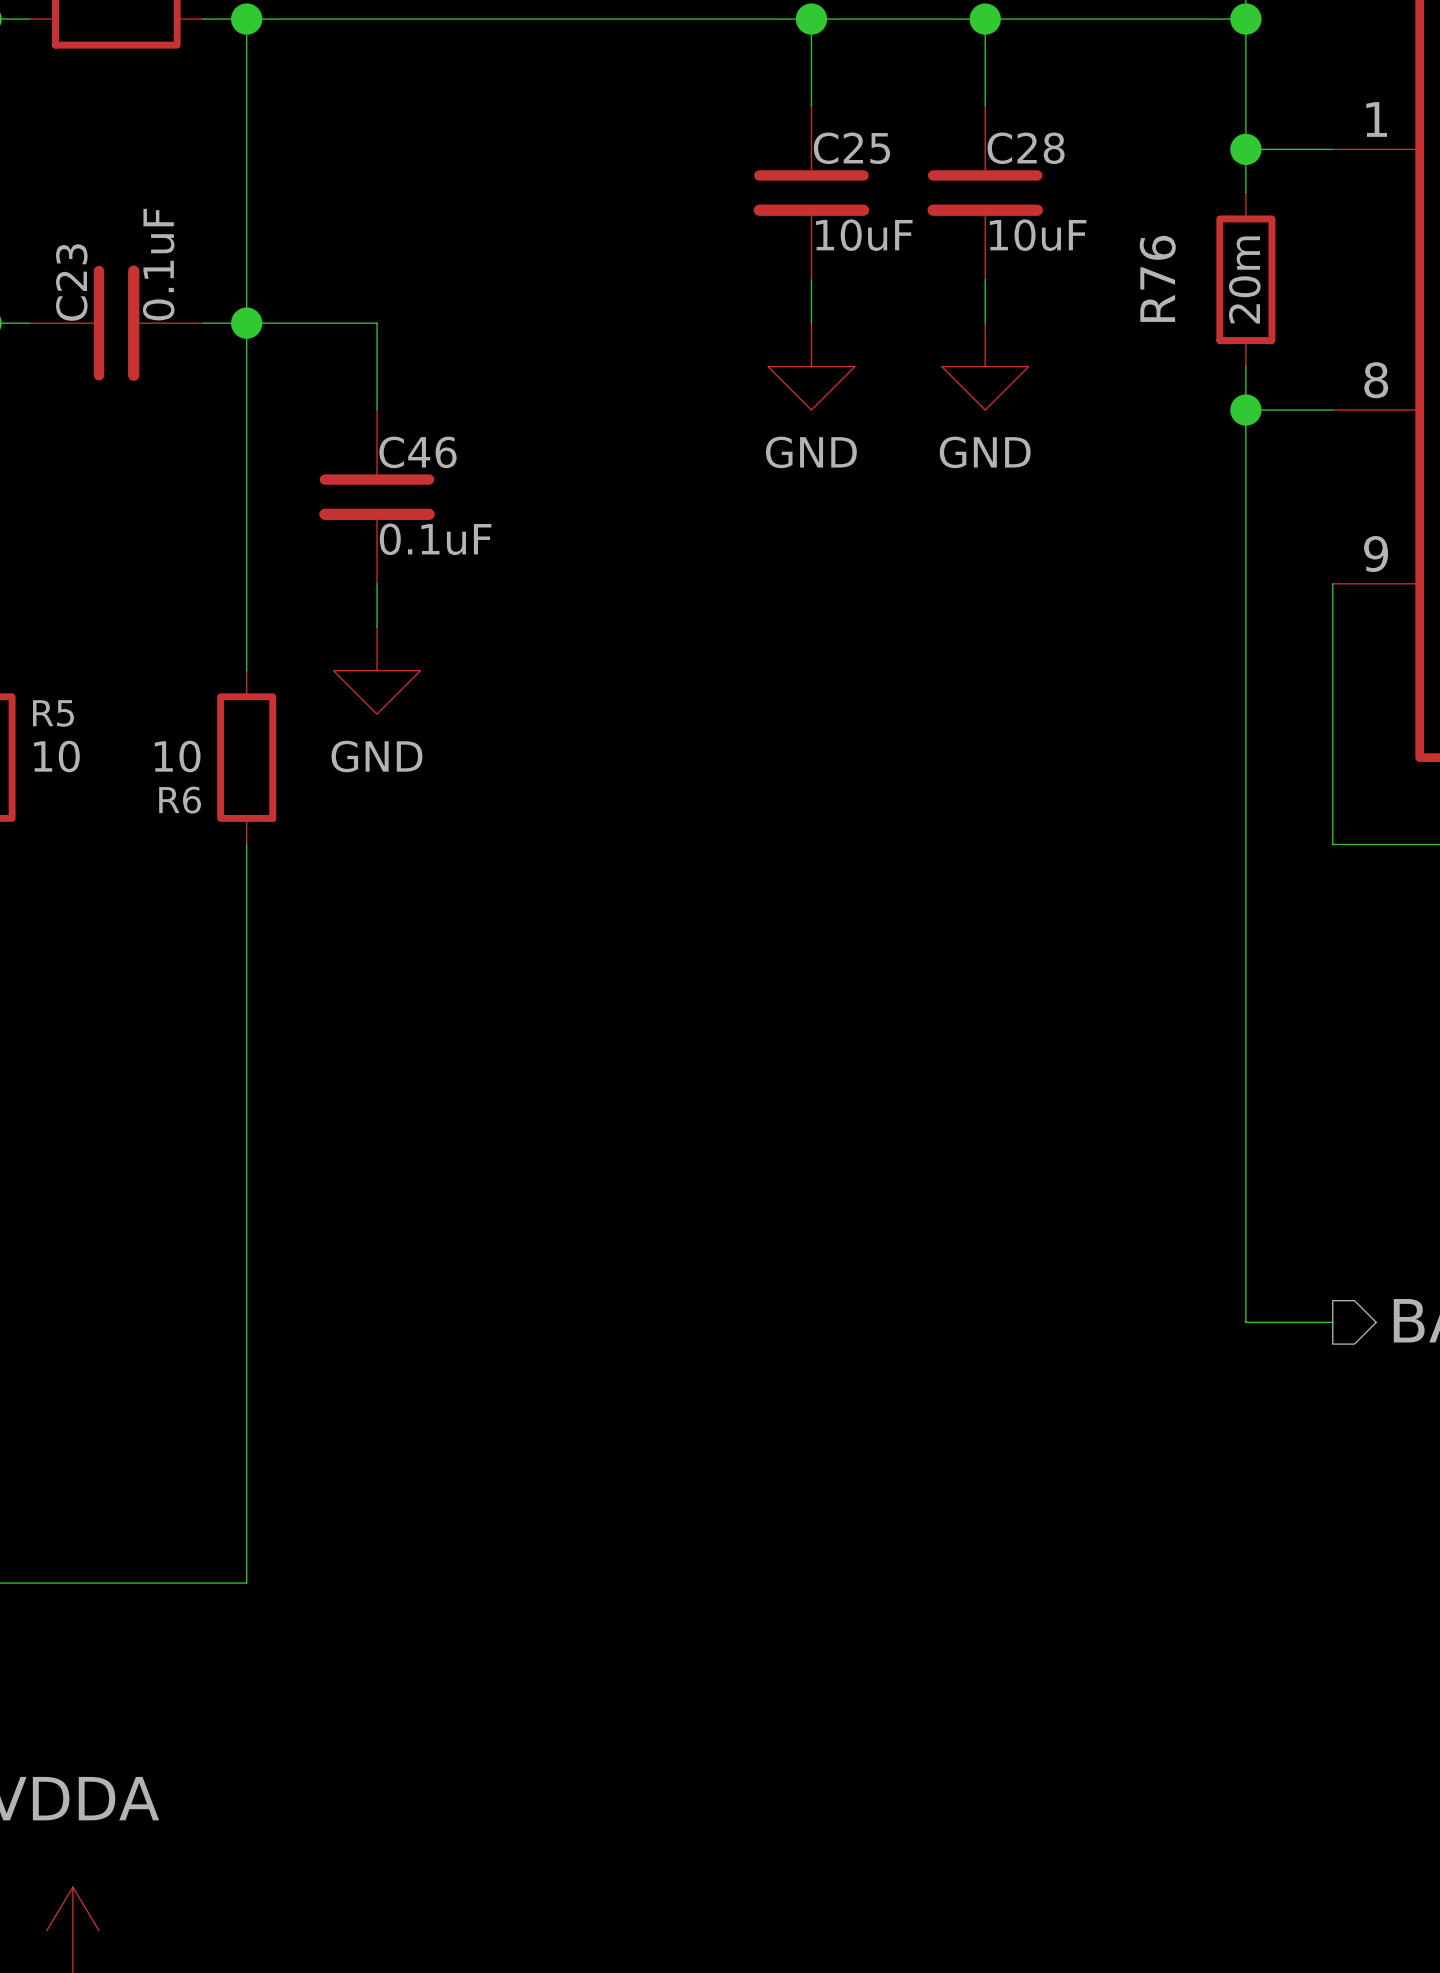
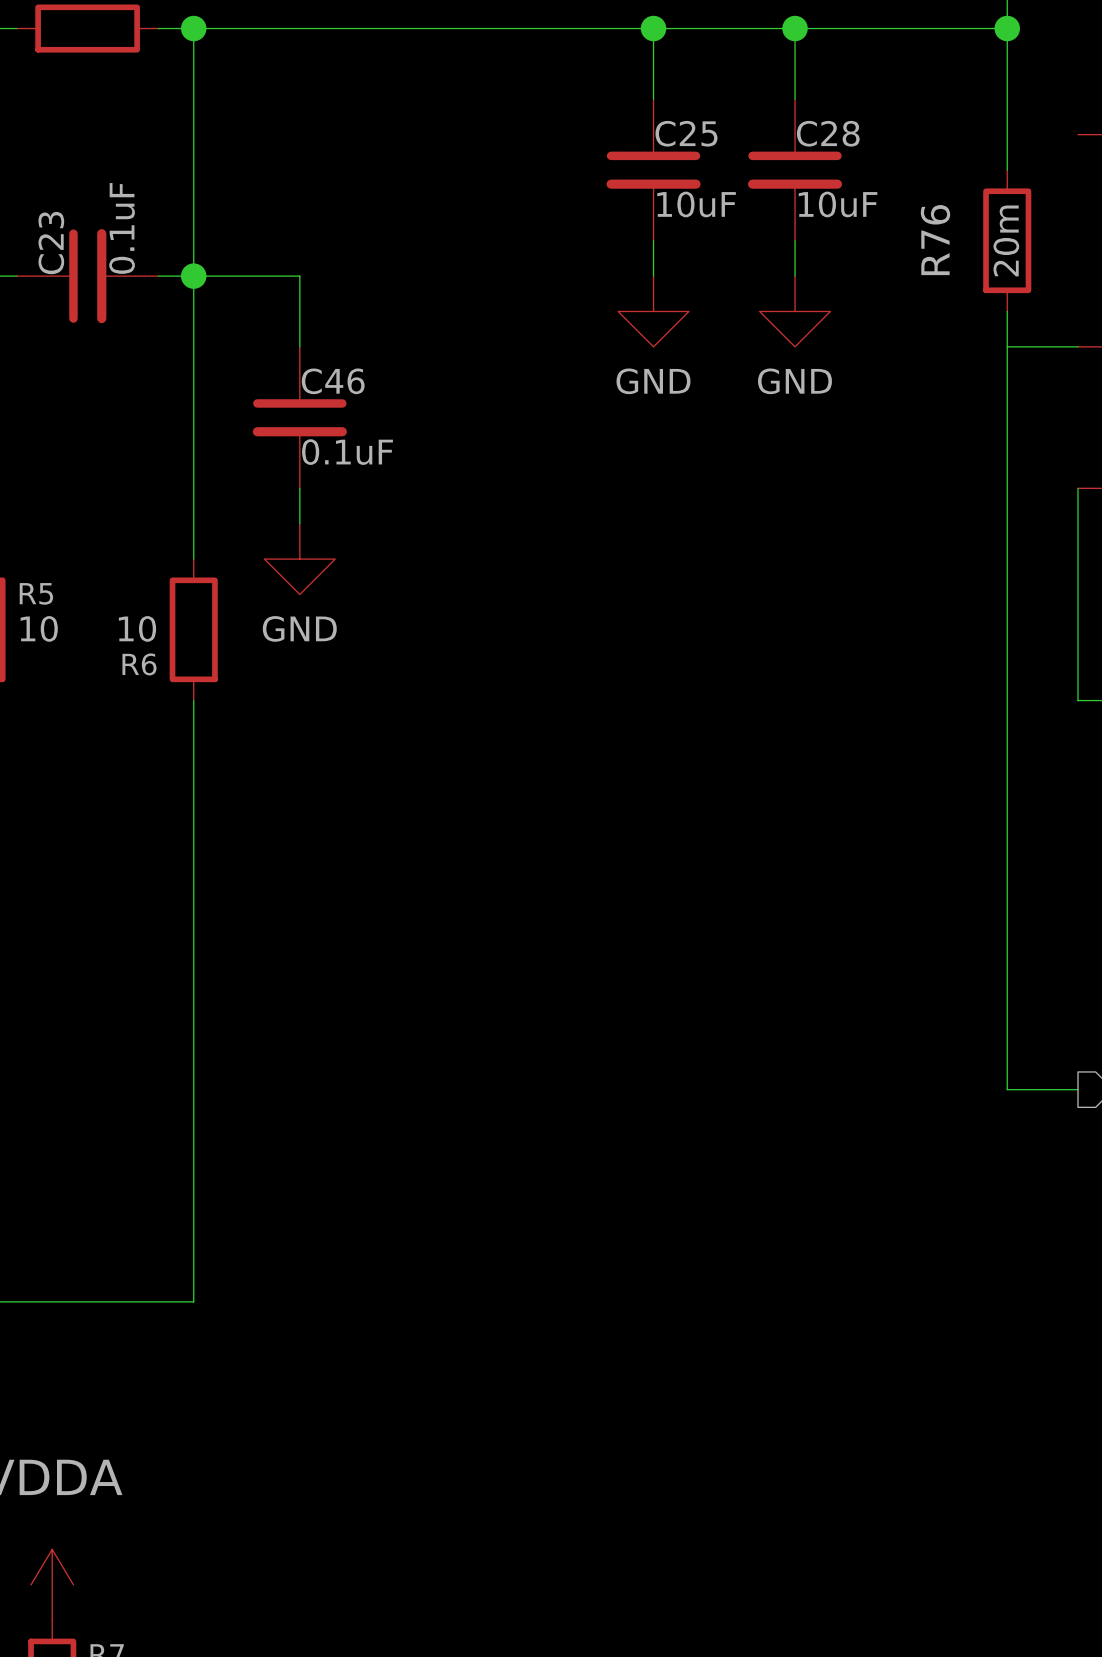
wire: (1245, 149) (1332, 149) -> none
junction: (1245, 149) -> none
junction: (1245, 410) -> none

